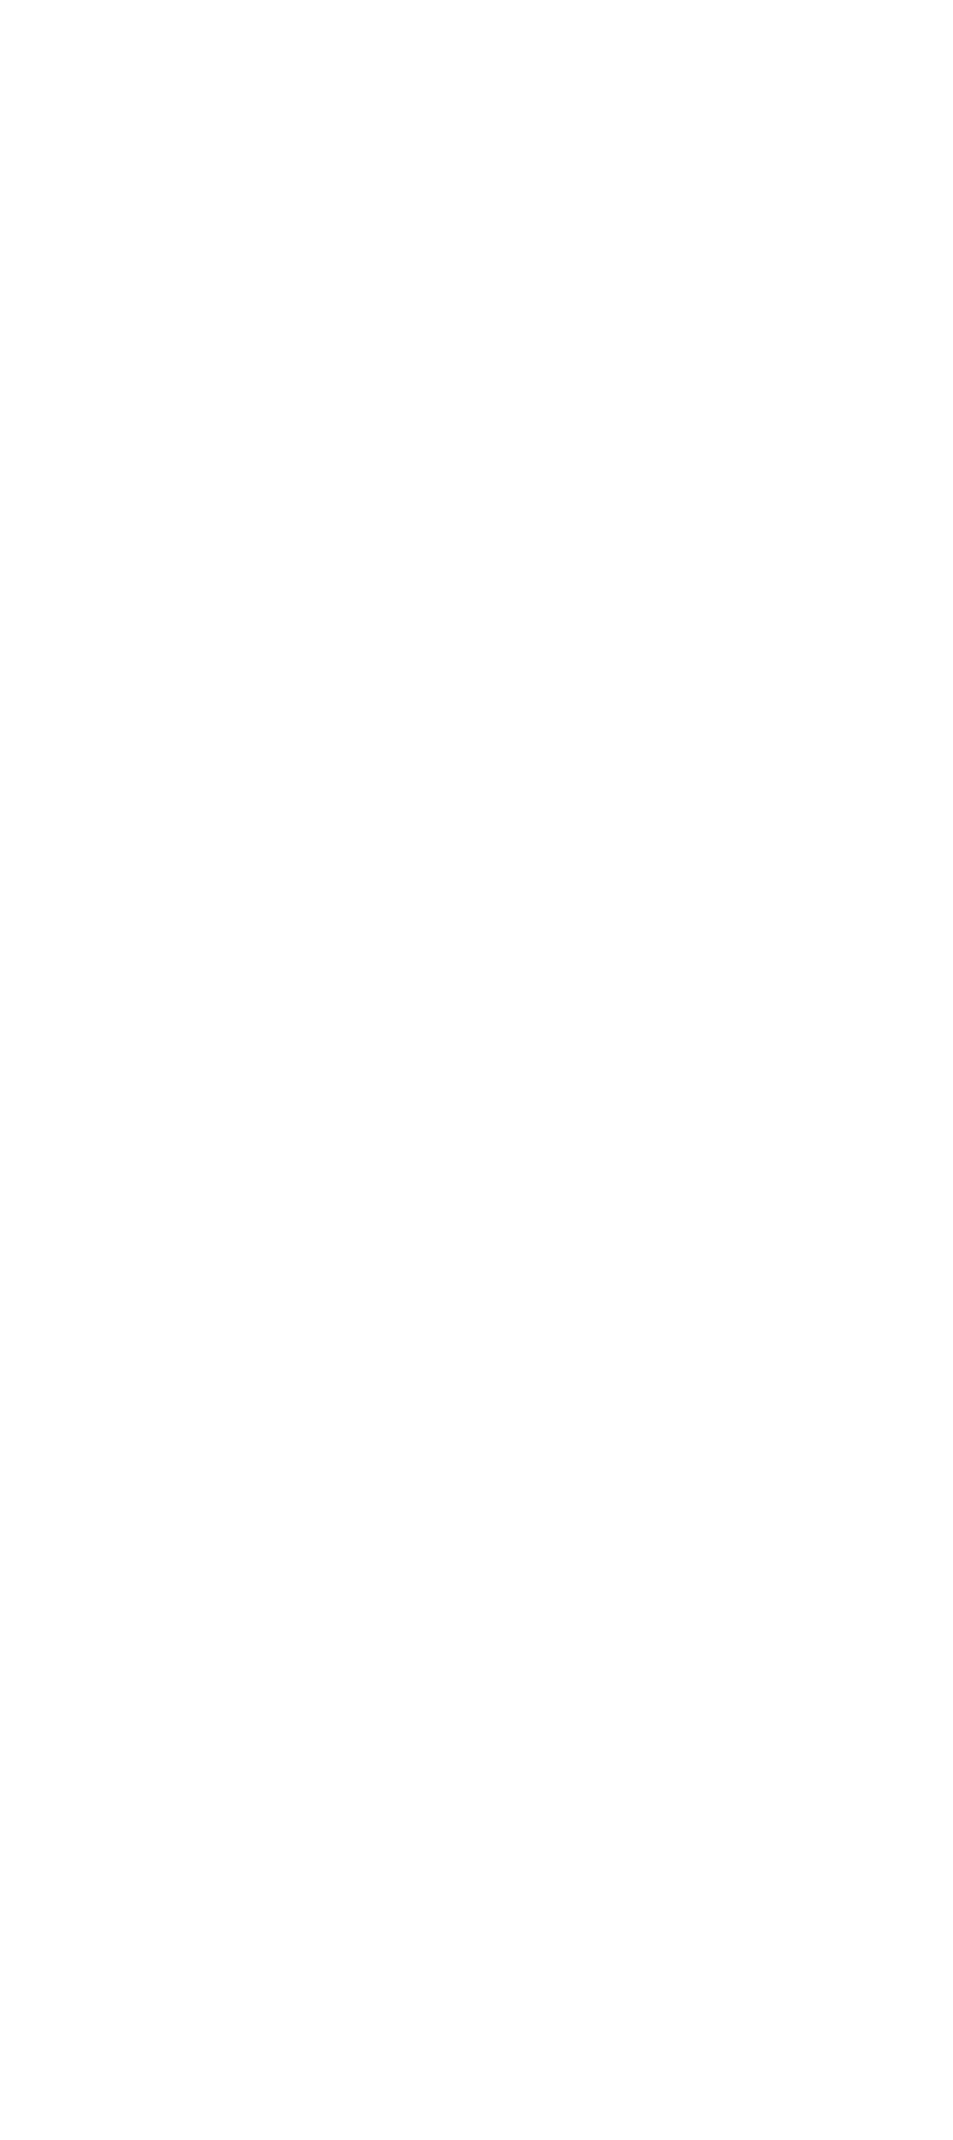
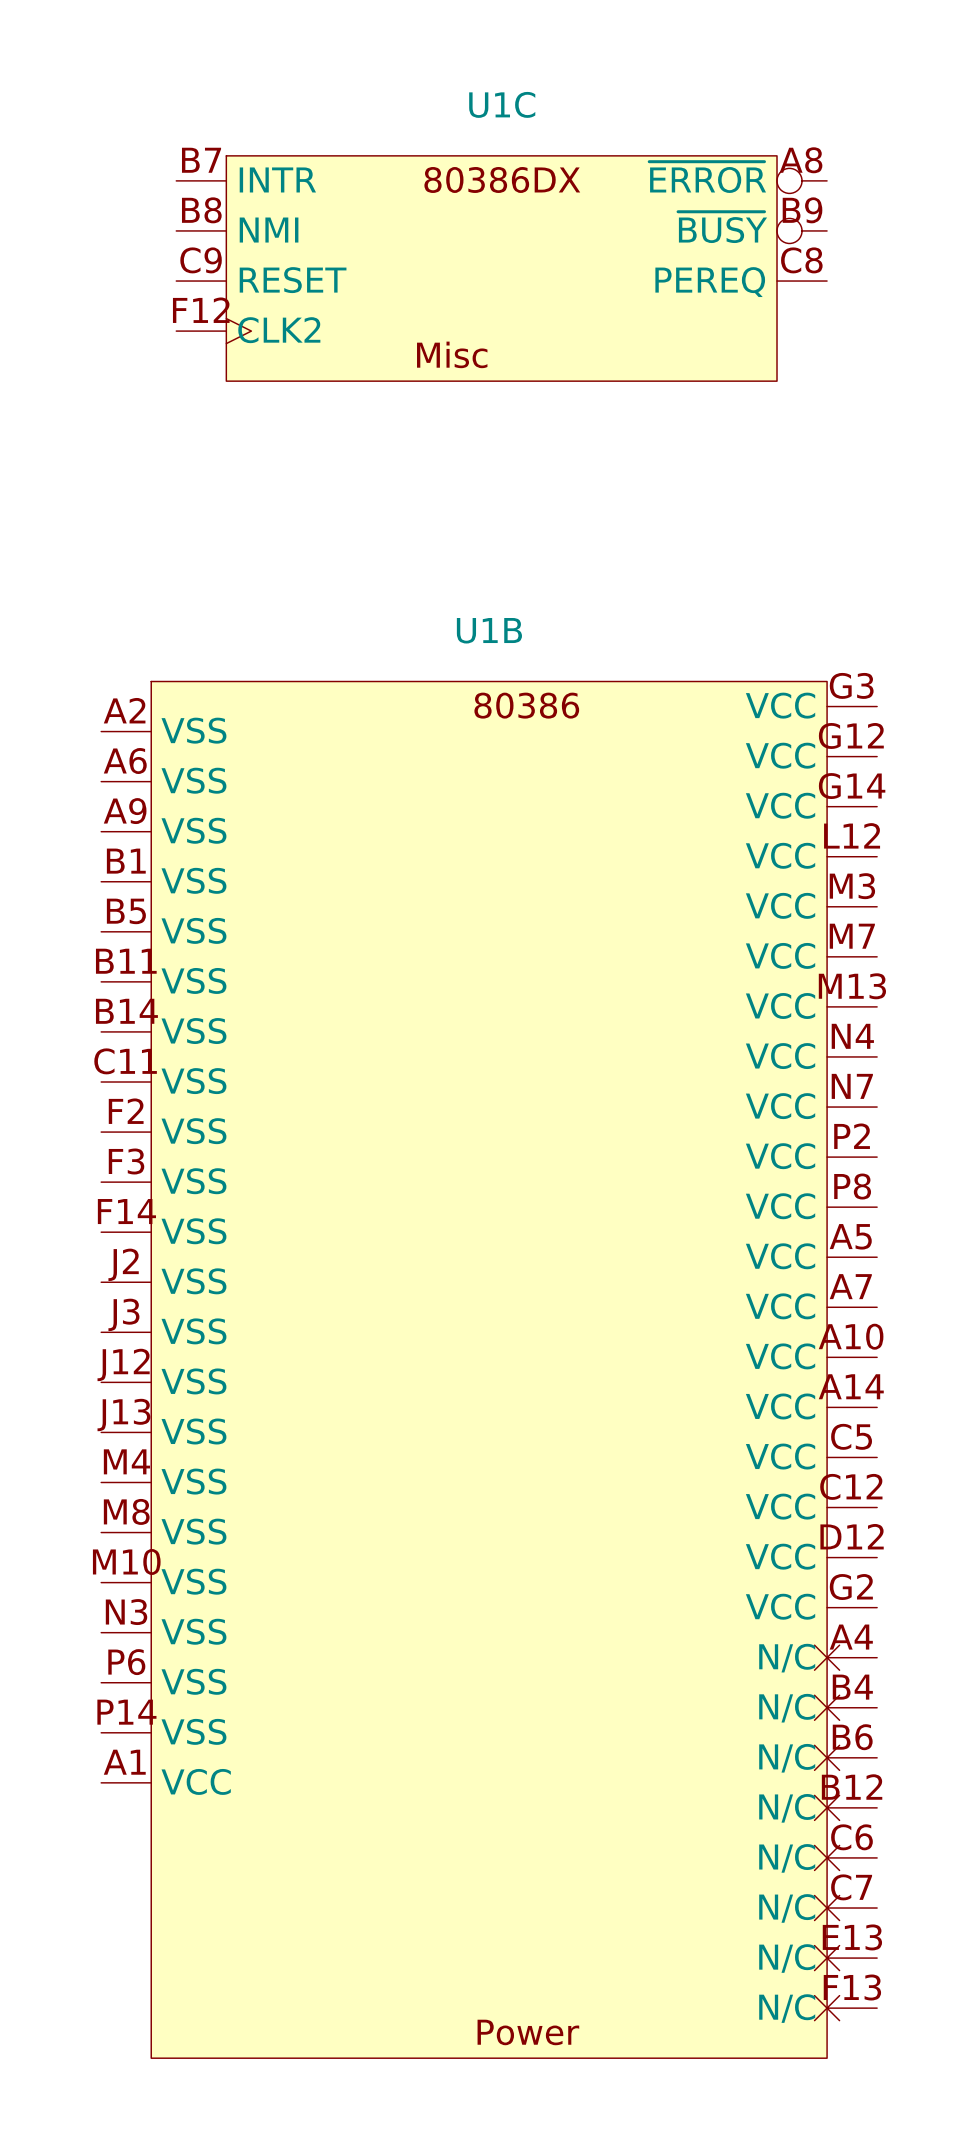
U1C: none -> (501, 268)
U1B: none -> (489, 1369)

